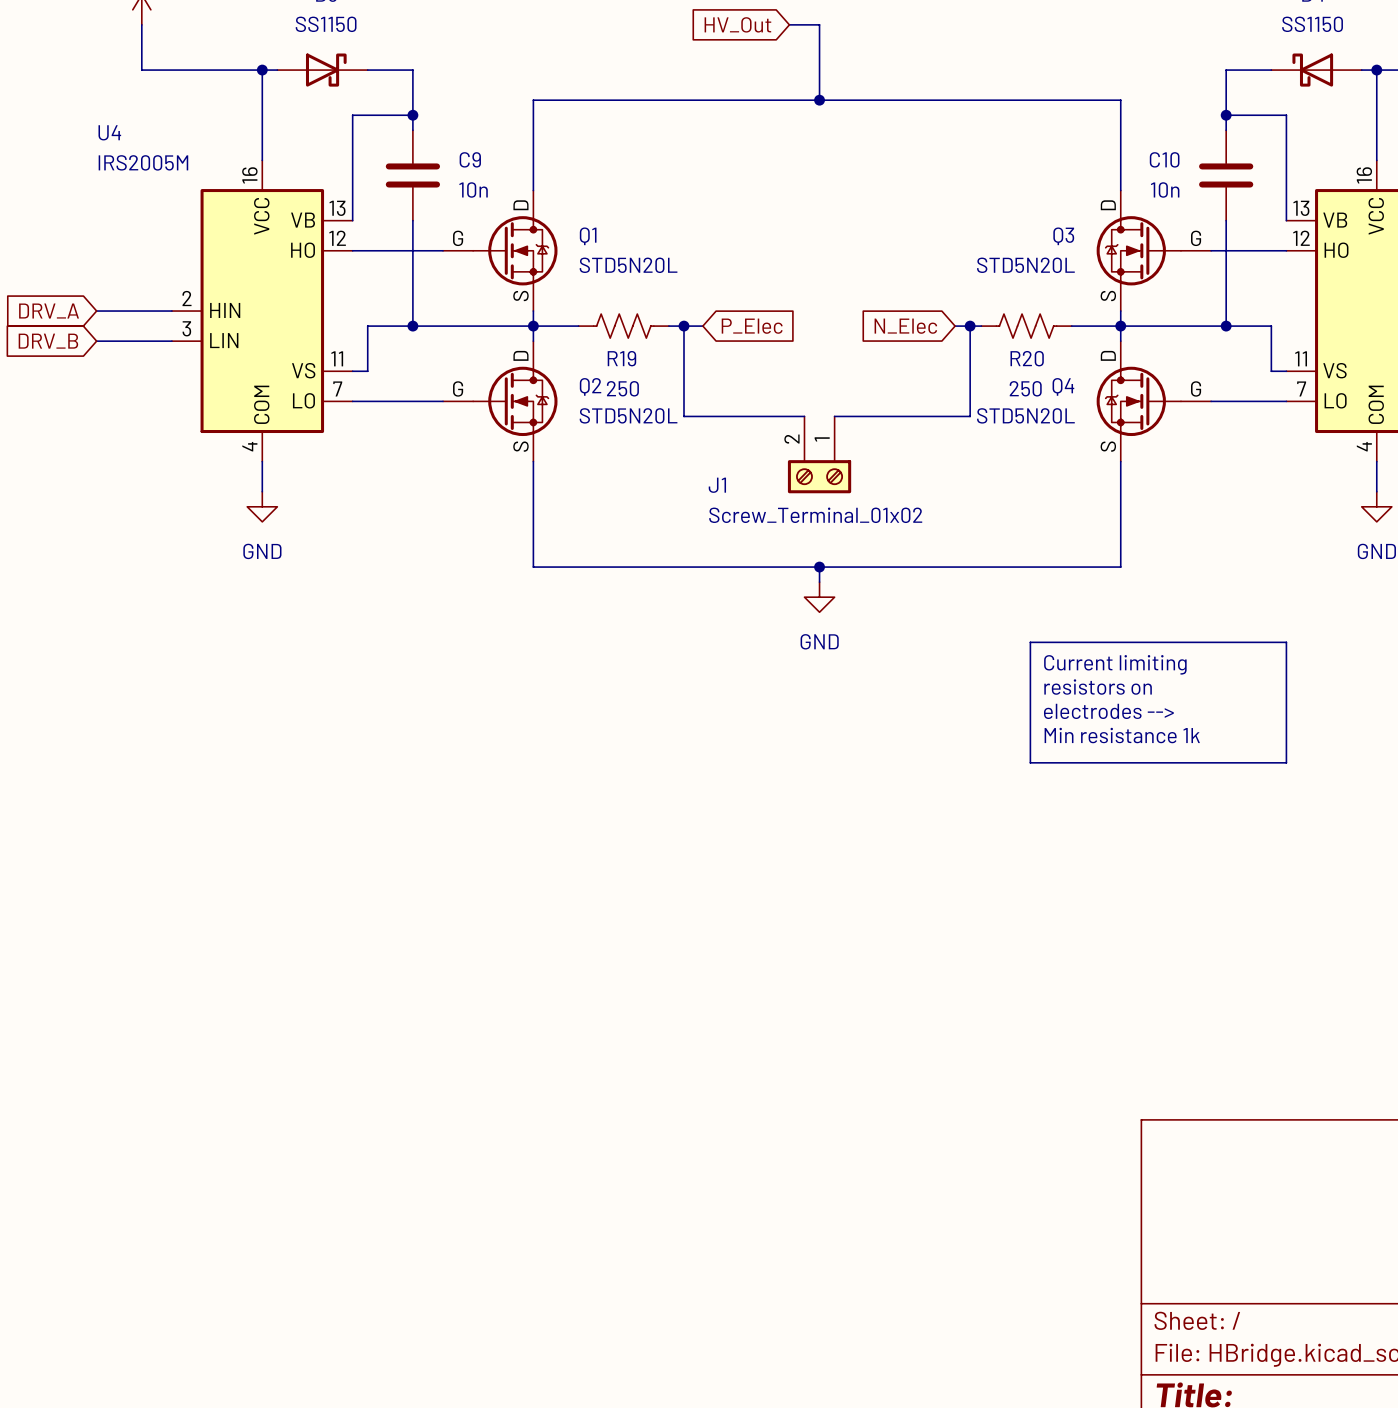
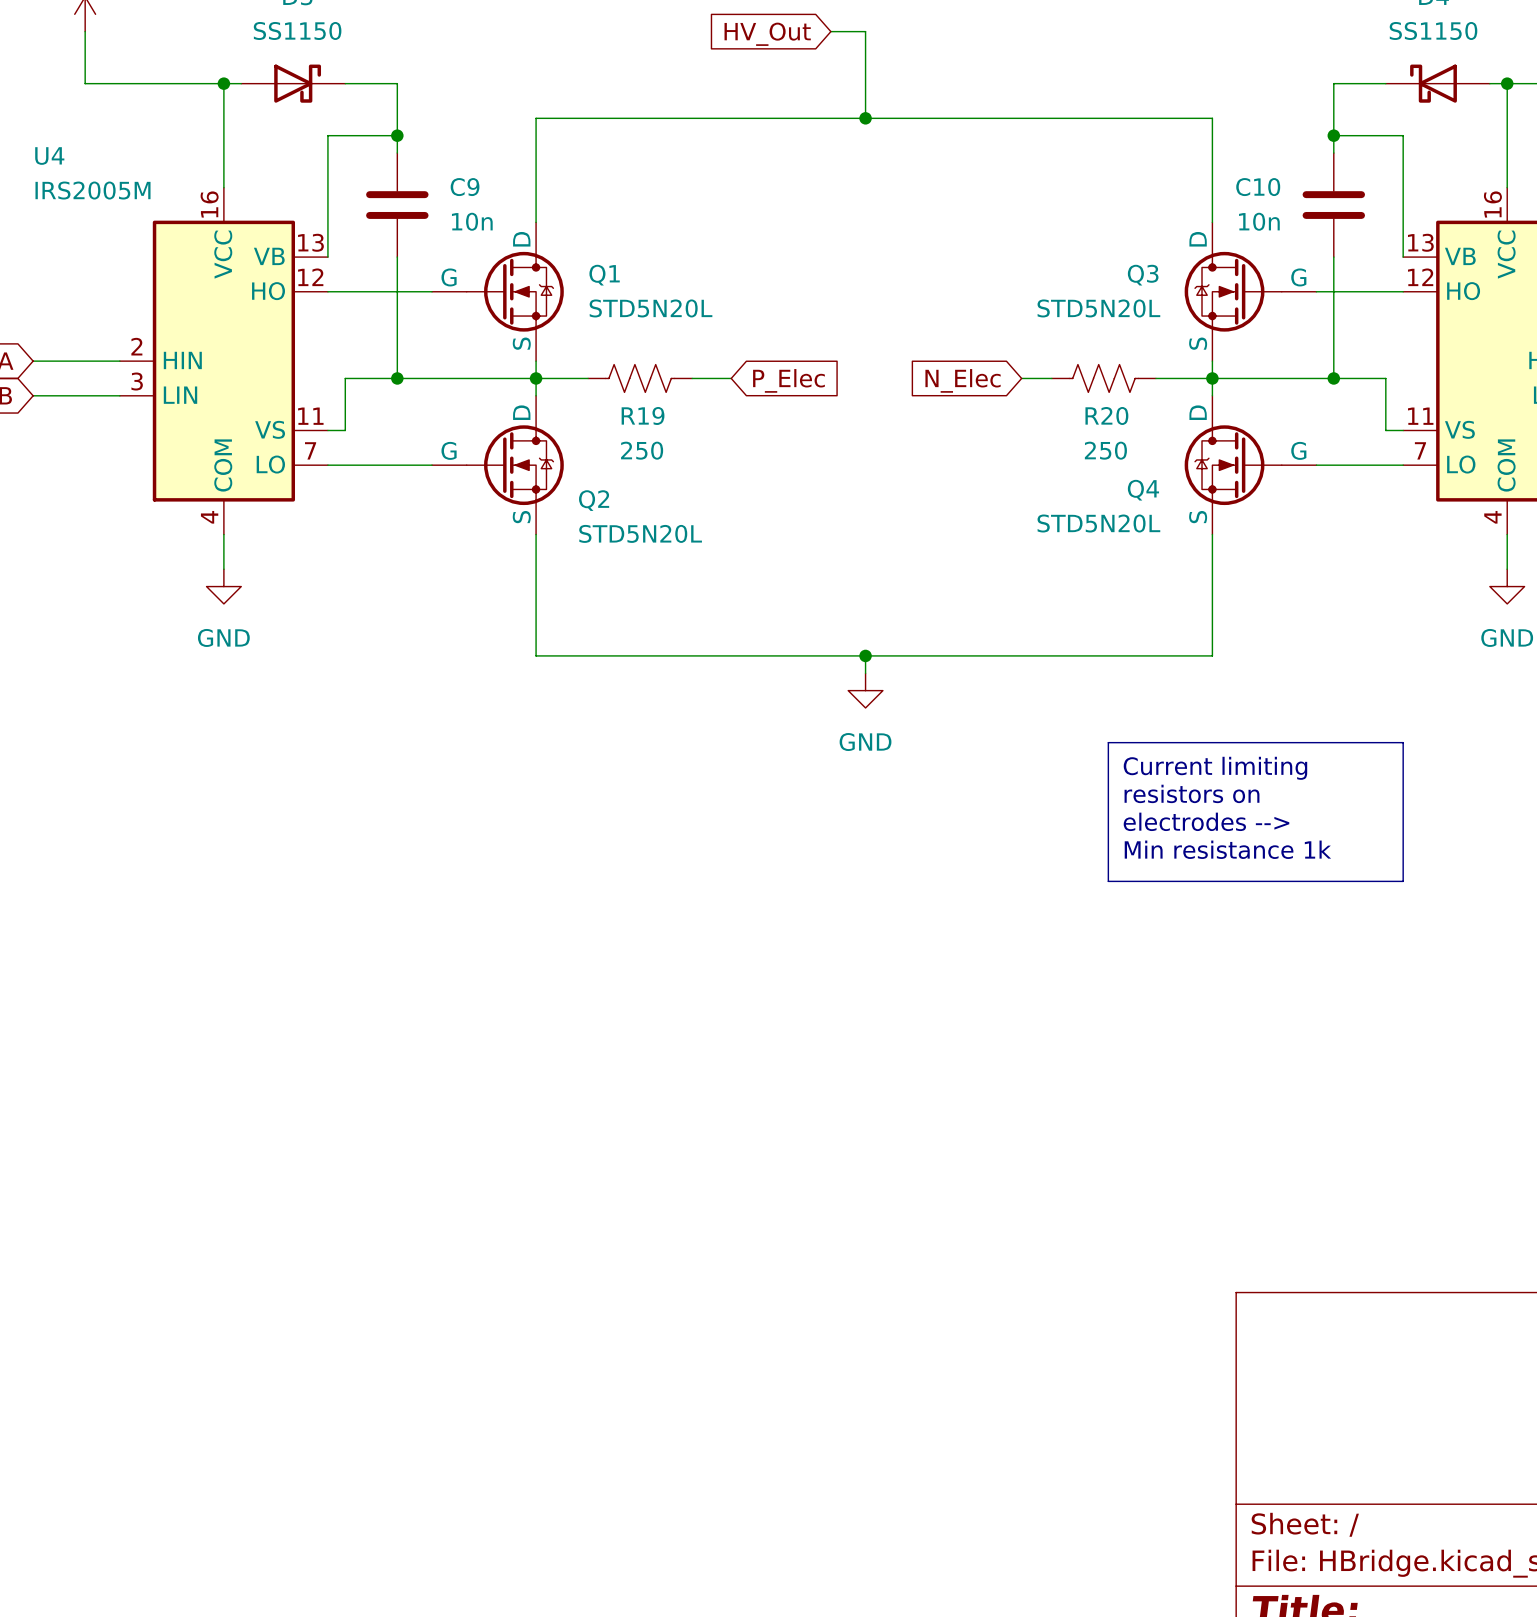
wire: (684, 326) (684, 416) (804, 416) -> none
junction: (684, 326) -> none
wire: (970, 326) (970, 416) (834, 416) -> none
junction: (970, 326) -> none
Q2 name position: Q2 (590, 386) -> Q2 (594, 500)
Q4 name position: Q4 (1063, 386) -> Q4 (1143, 490)
Q2 value position: STD5N20L (628, 415) -> STD5N20L (640, 533)
Q4 value position: STD5N20L (1025, 415) -> STD5N20L (1098, 523)
J1: Screw_Terminal_01x02 (819, 454) -> none

